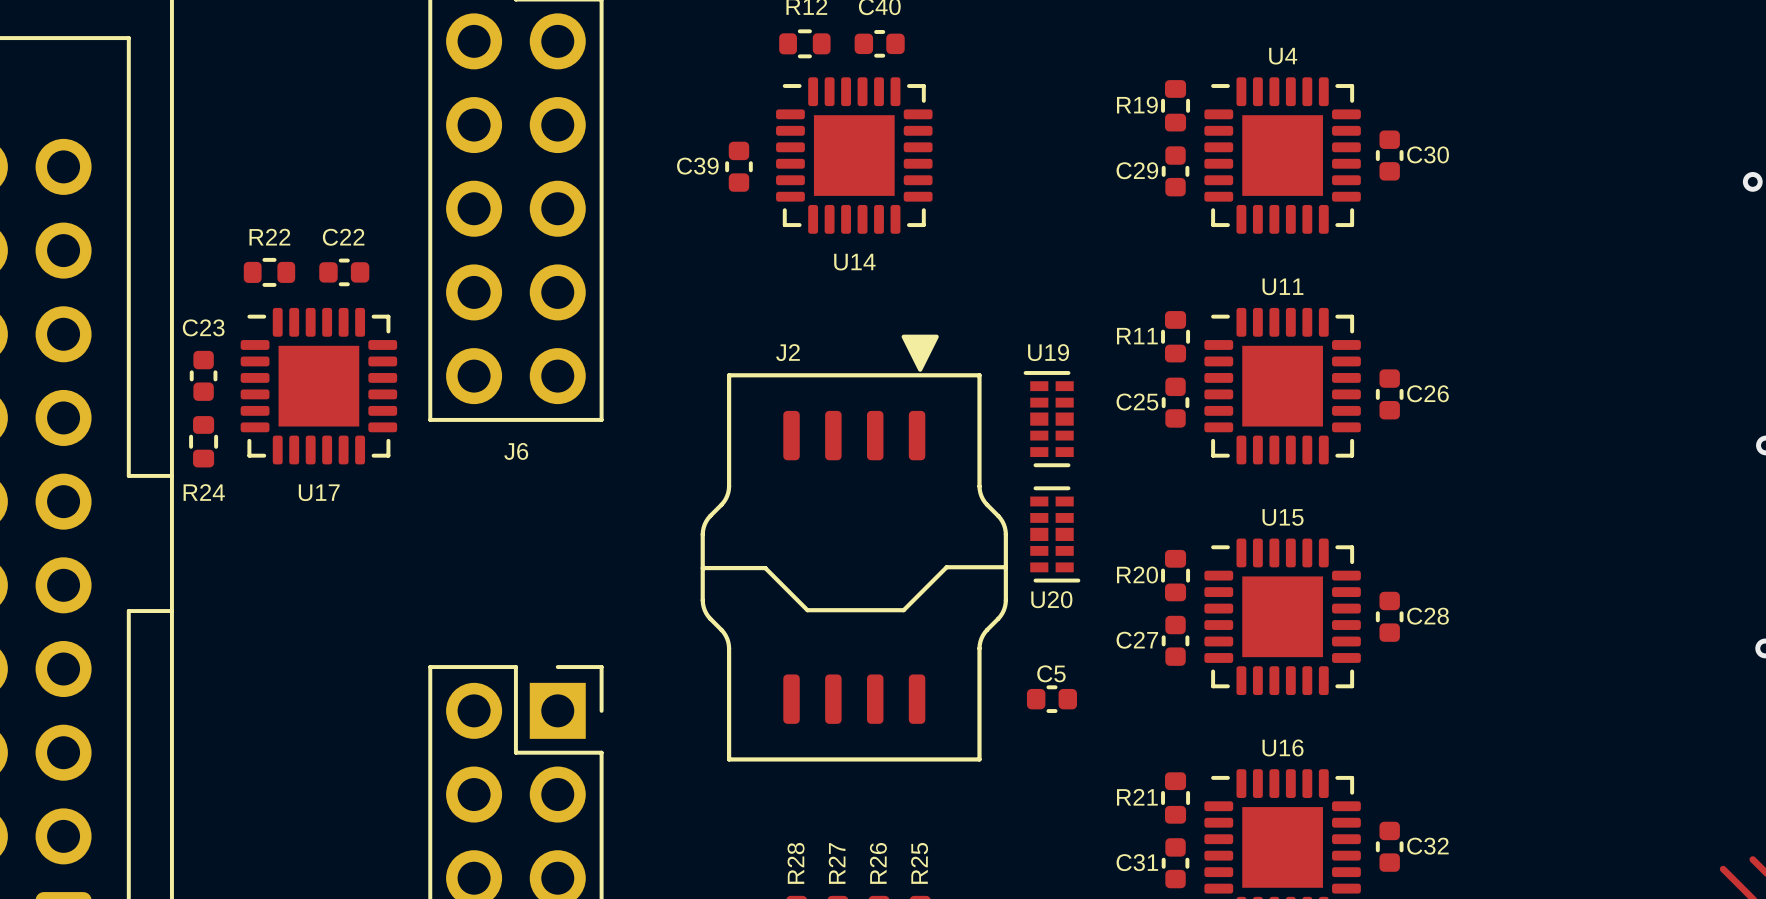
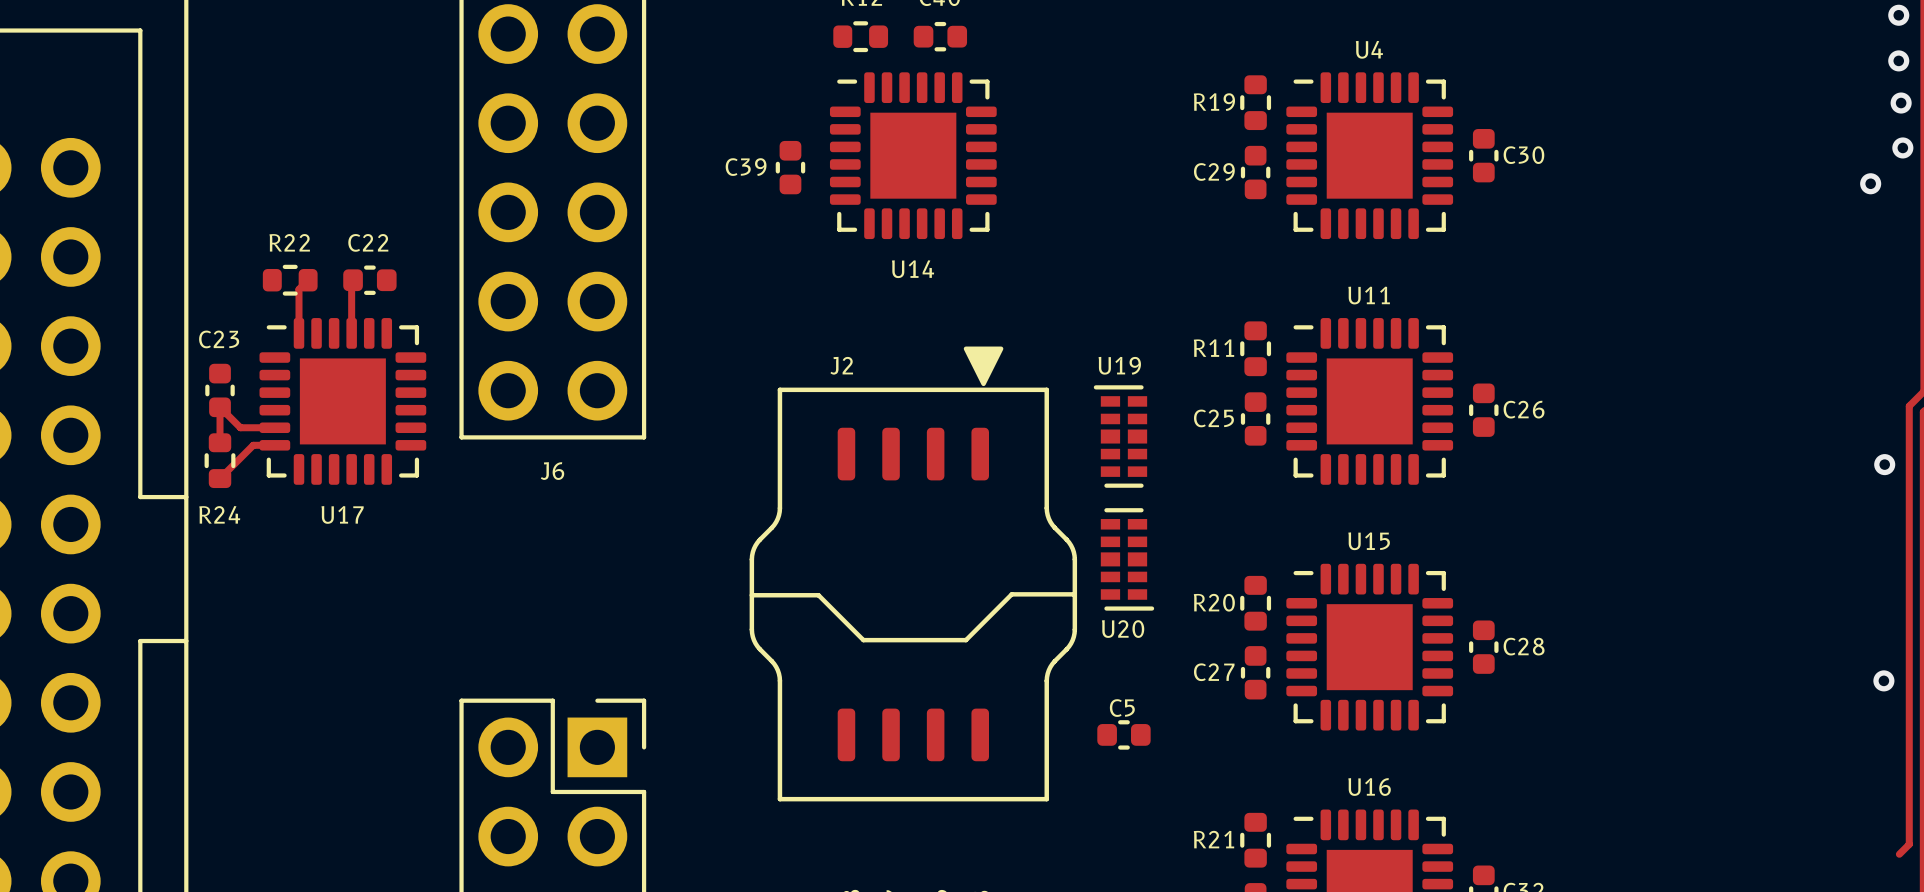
track: none -> (308, 280) (299, 289) (299, 333)
track: none -> (353, 280) (351, 333)
track: none -> (274, 427) (240, 427) (220, 407) (220, 442)
track: none -> (274, 445) (253, 445) (220, 478)

